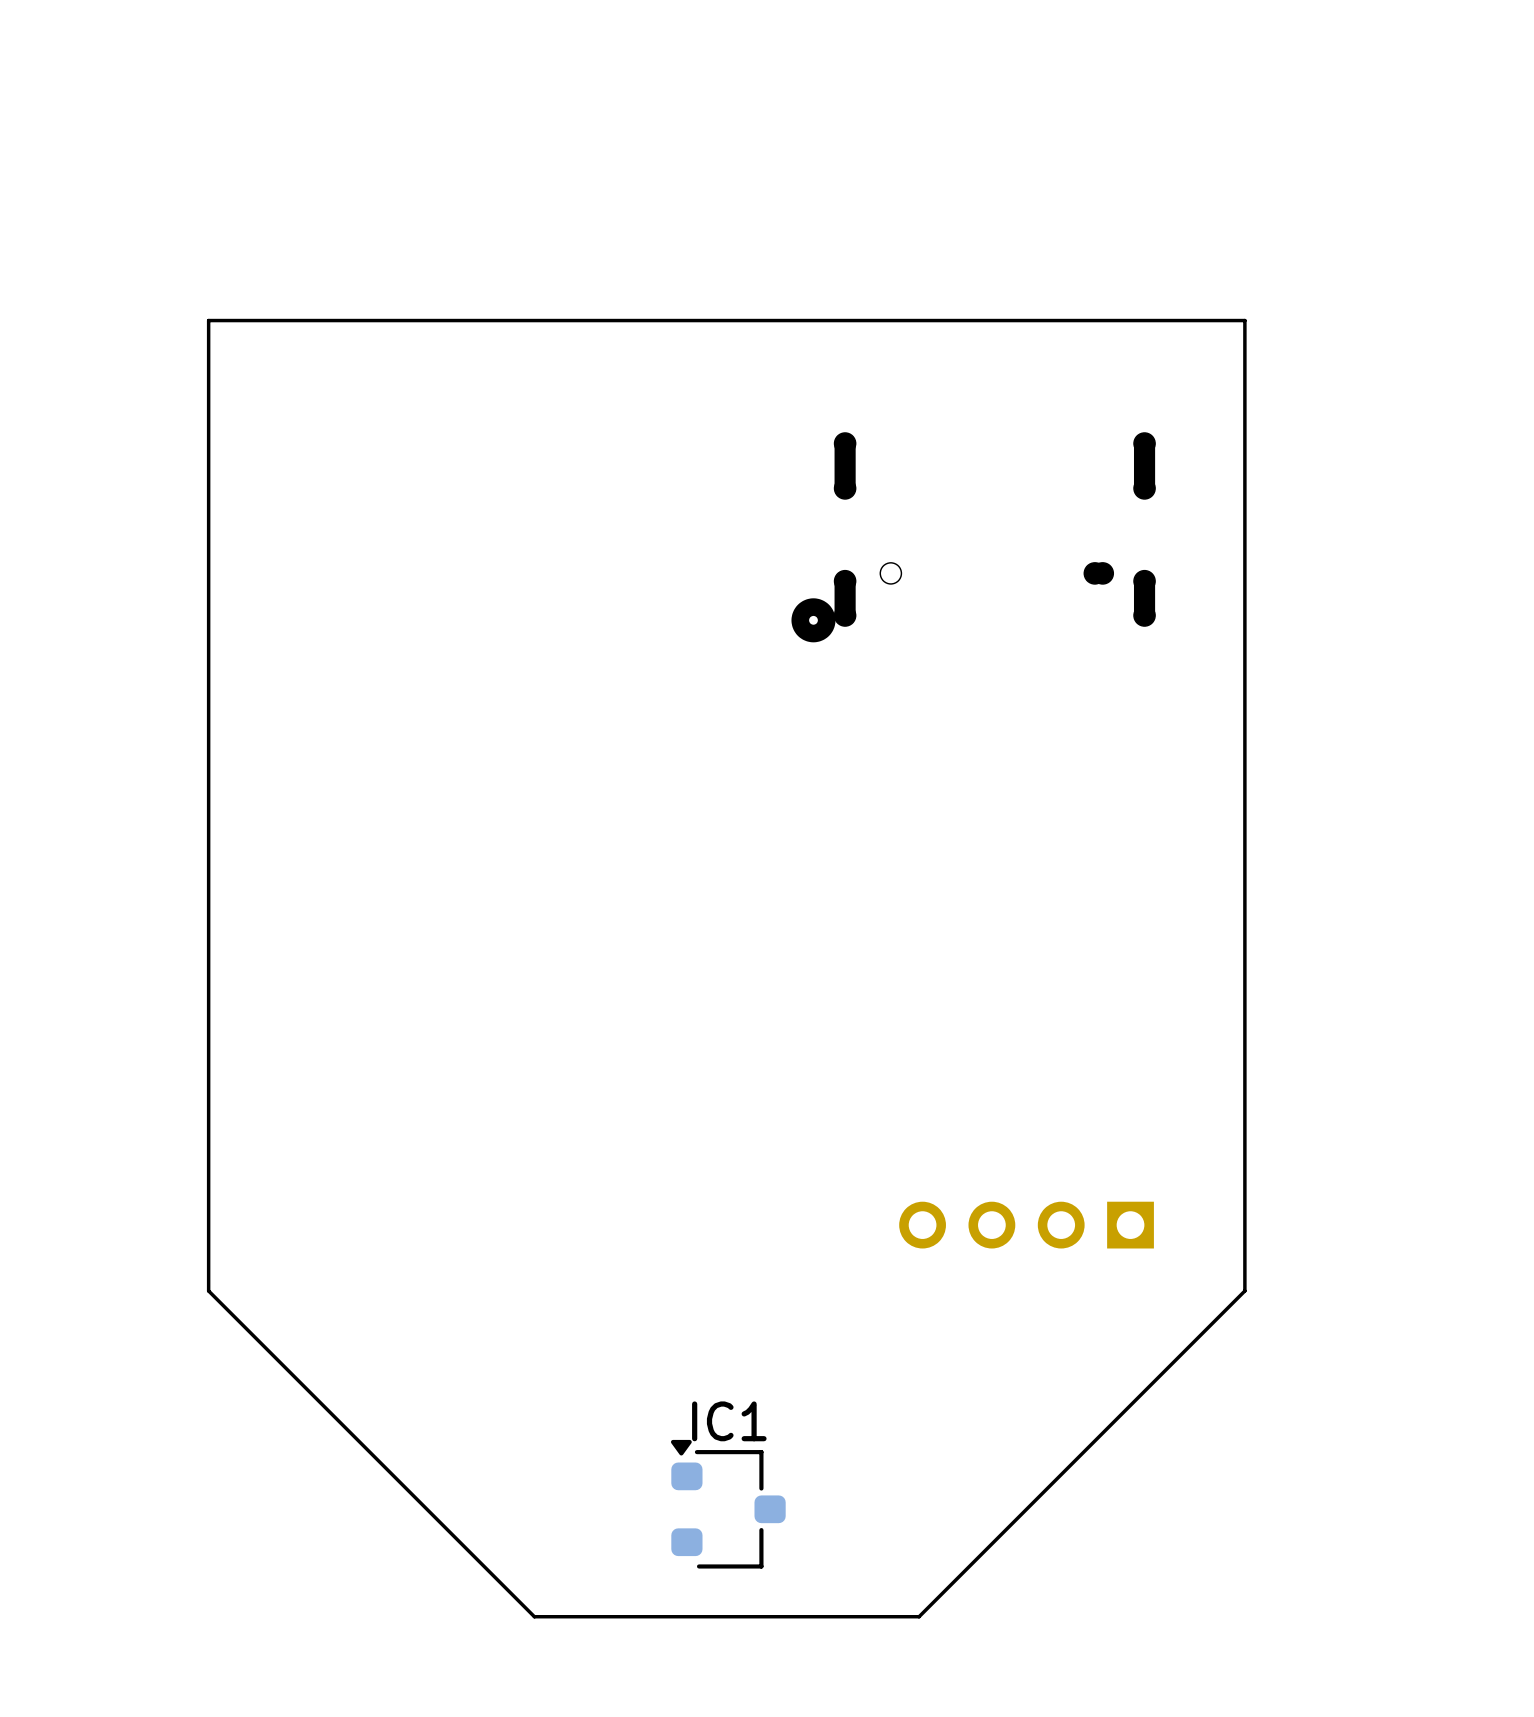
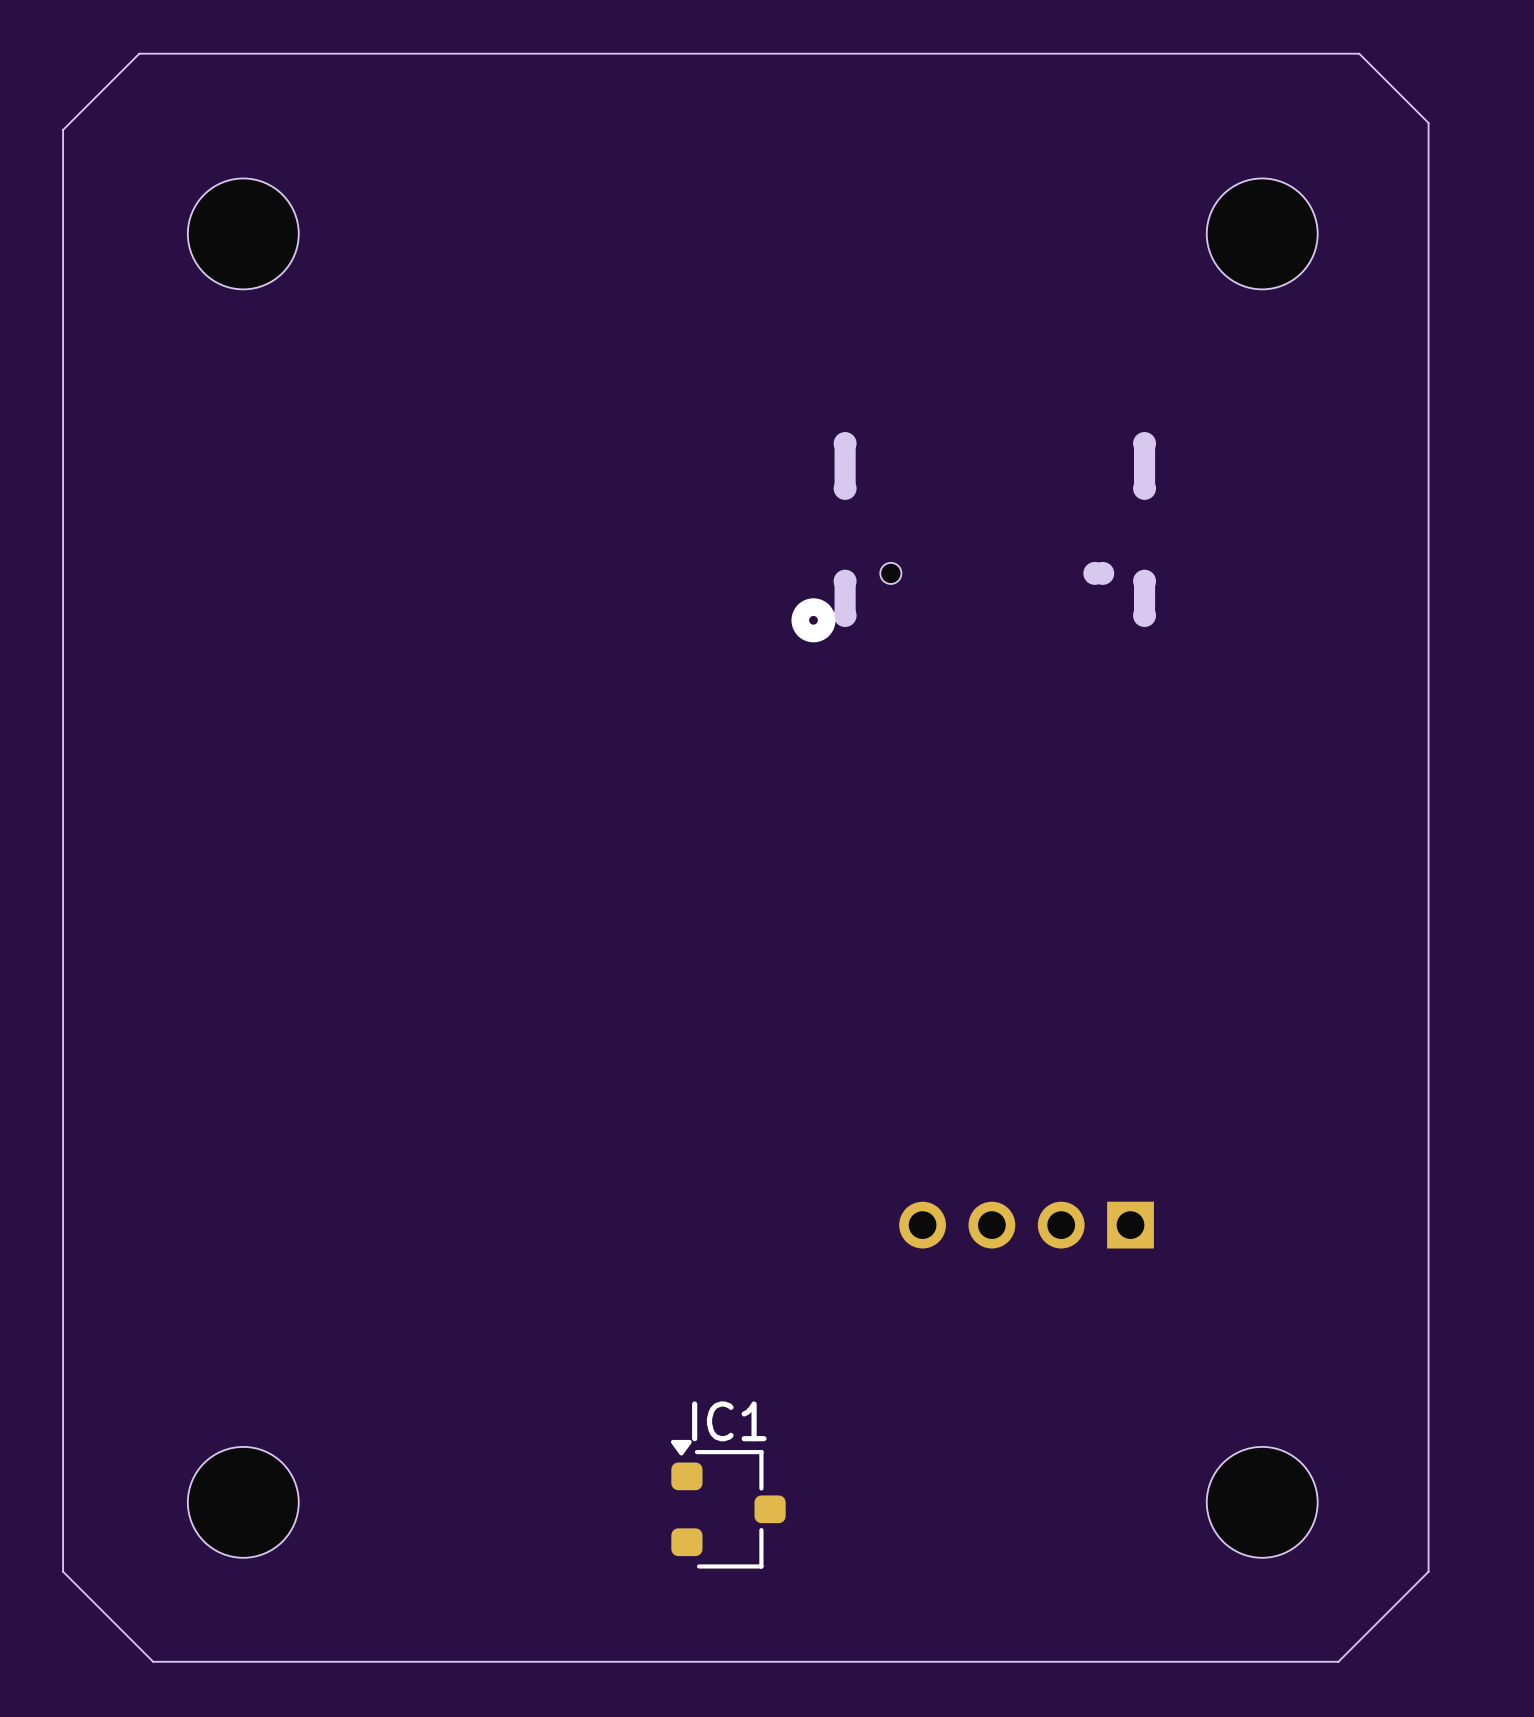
part: none -> (243, 233)
part: none -> (1262, 233)
board edge: (1244, 320) (208, 320) (208, 1290) (534, 1616) (919, 1616) (1244, 1290) (1244, 320) -> (1359, 53) (1428, 123) (1428, 1571) (1338, 1661) (153, 1661) (63, 1571) (63, 129) (139, 53) (1359, 53)
part: none -> (243, 1502)
part: none -> (1262, 1502)

